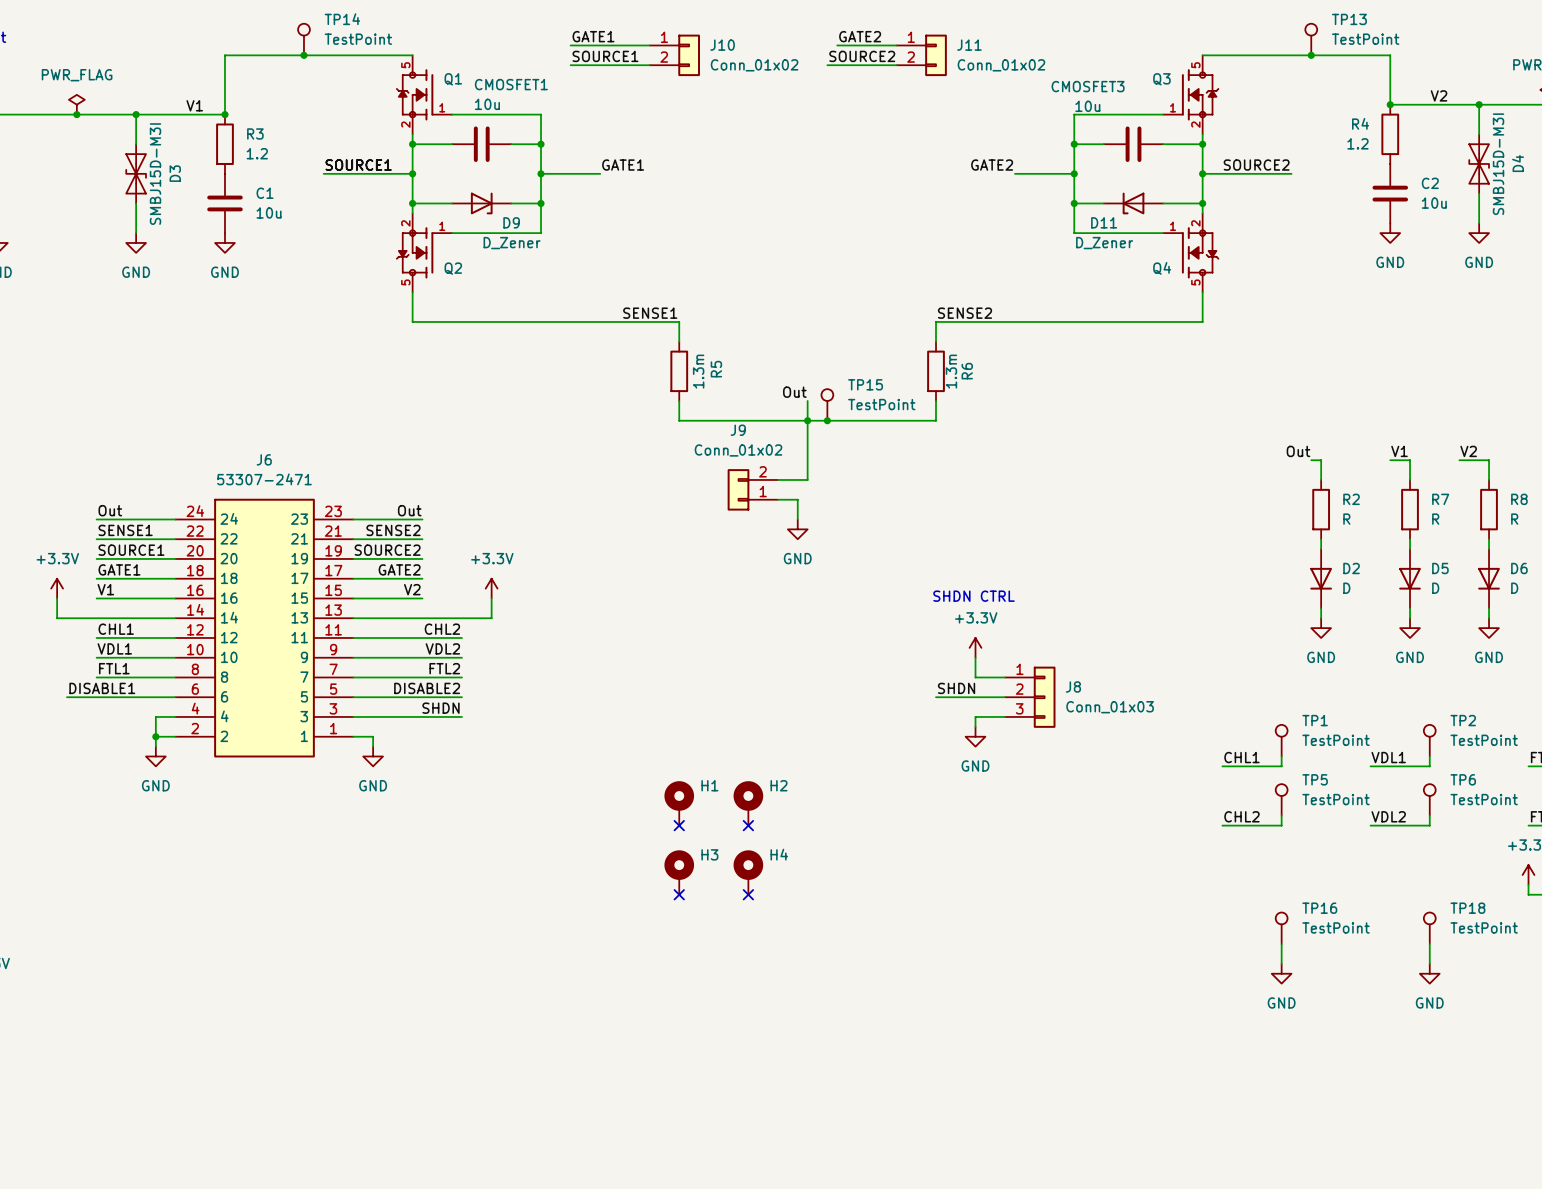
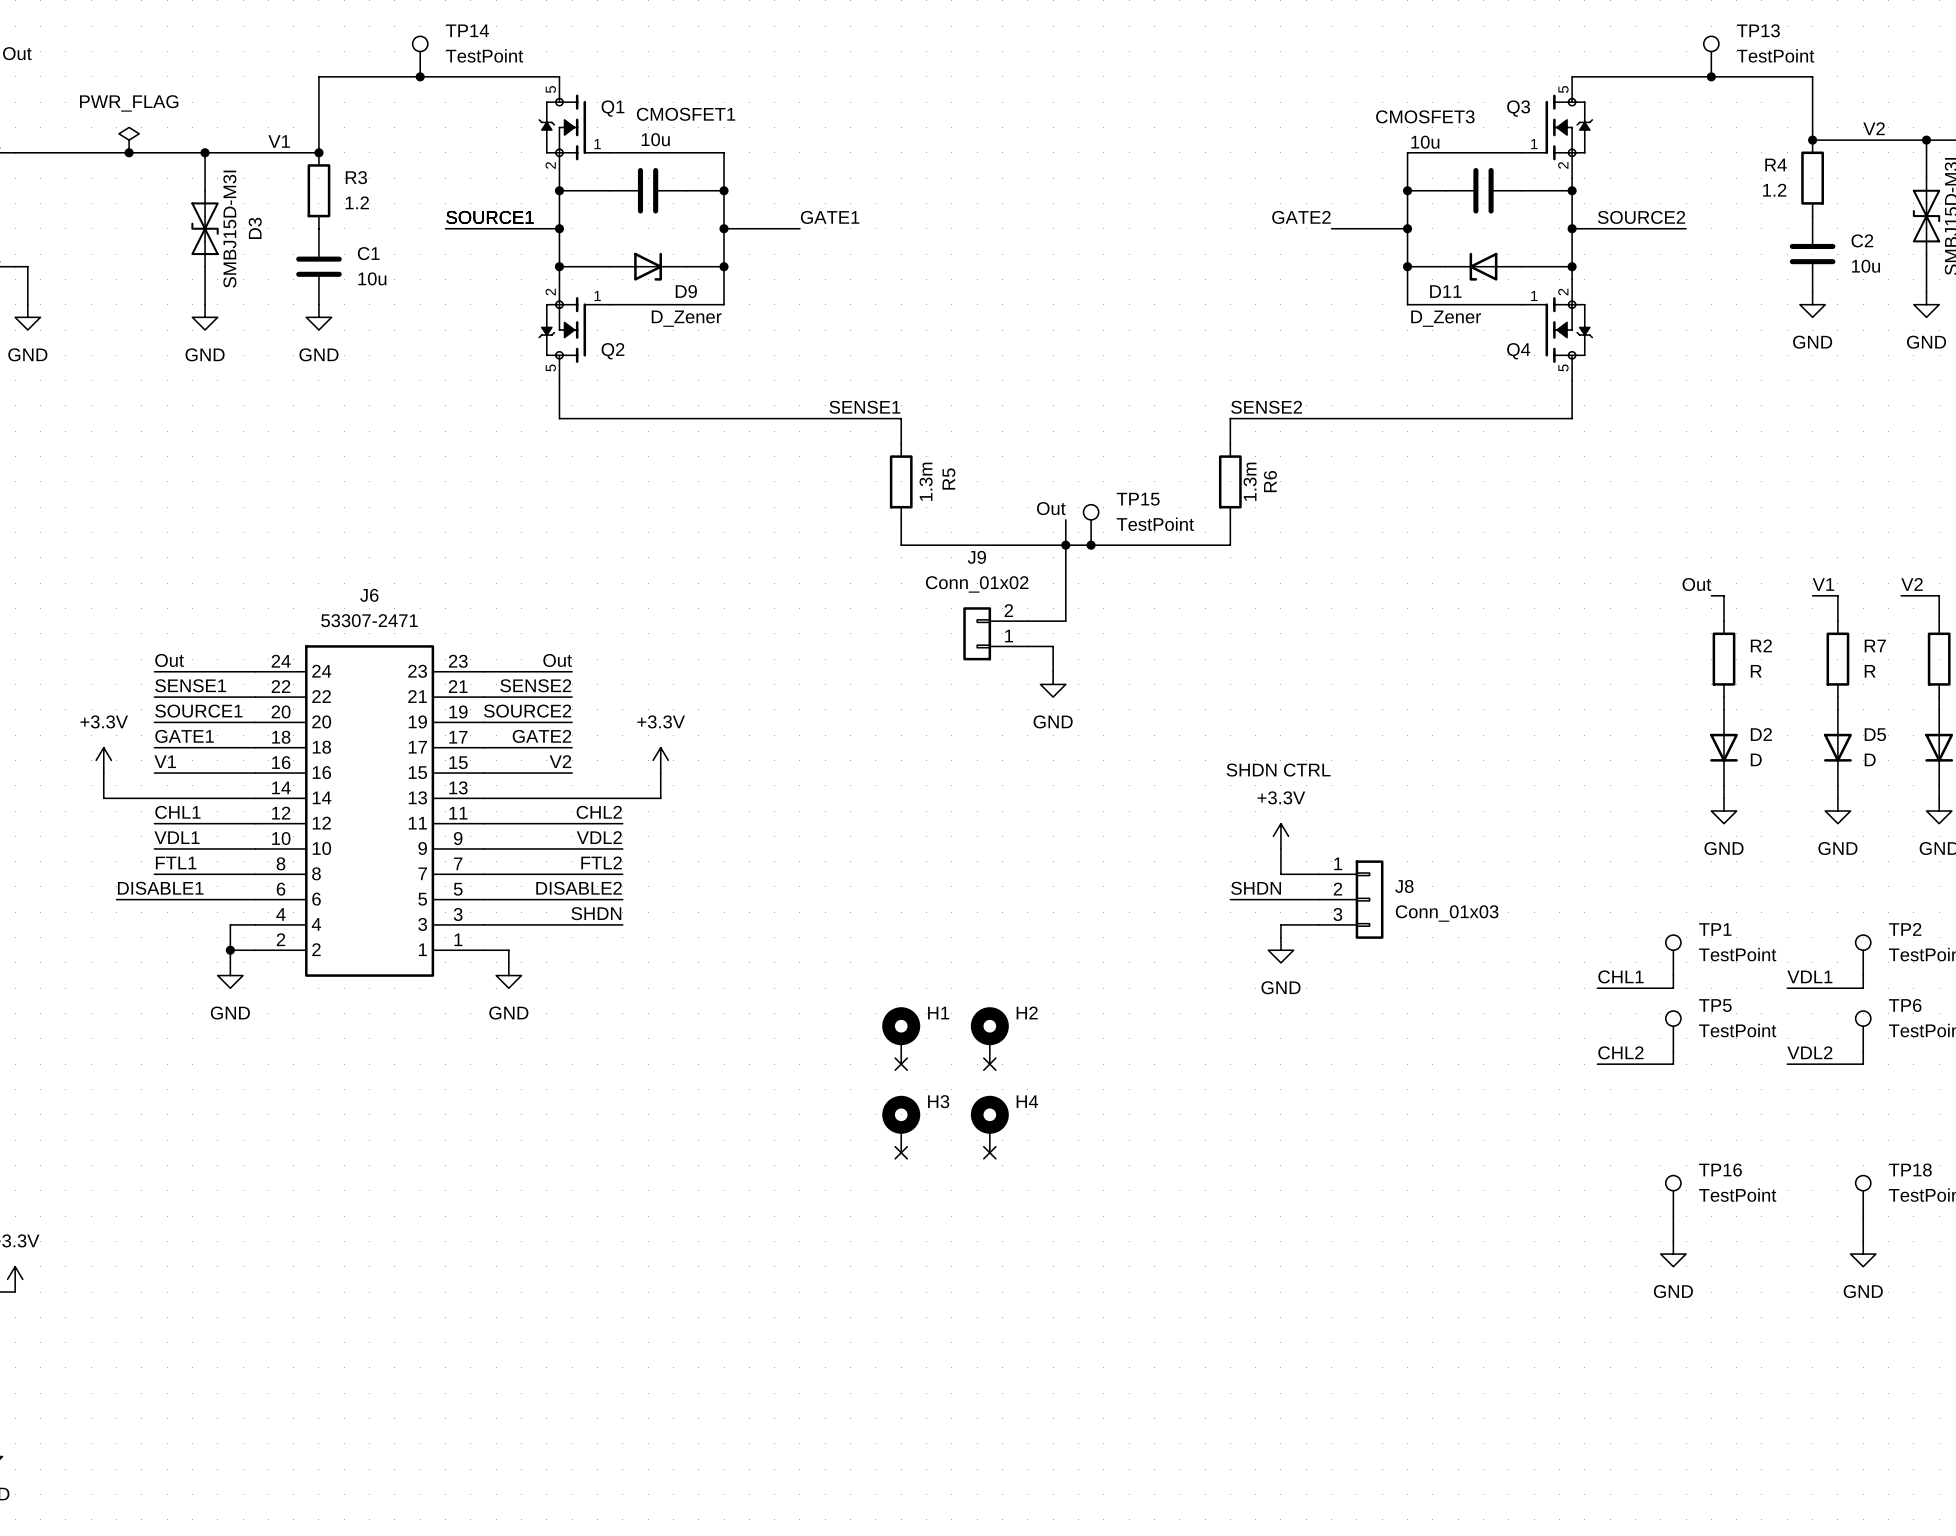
label: GATE1 (593, 36) -> none
label: GATE2 (860, 36) -> none
wire: (570, 45) (649, 45) -> none
wire: (837, 45) (896, 45) -> none
J10: Conn_01x02 (674, 55) -> none
J11: Conn_01x02 (921, 55) -> none
label: SOURCE1 (605, 56) -> none
label: SOURCE2 (862, 56) -> none
wire: (570, 65) (649, 65) -> none
wire: (827, 65) (896, 65) -> none

